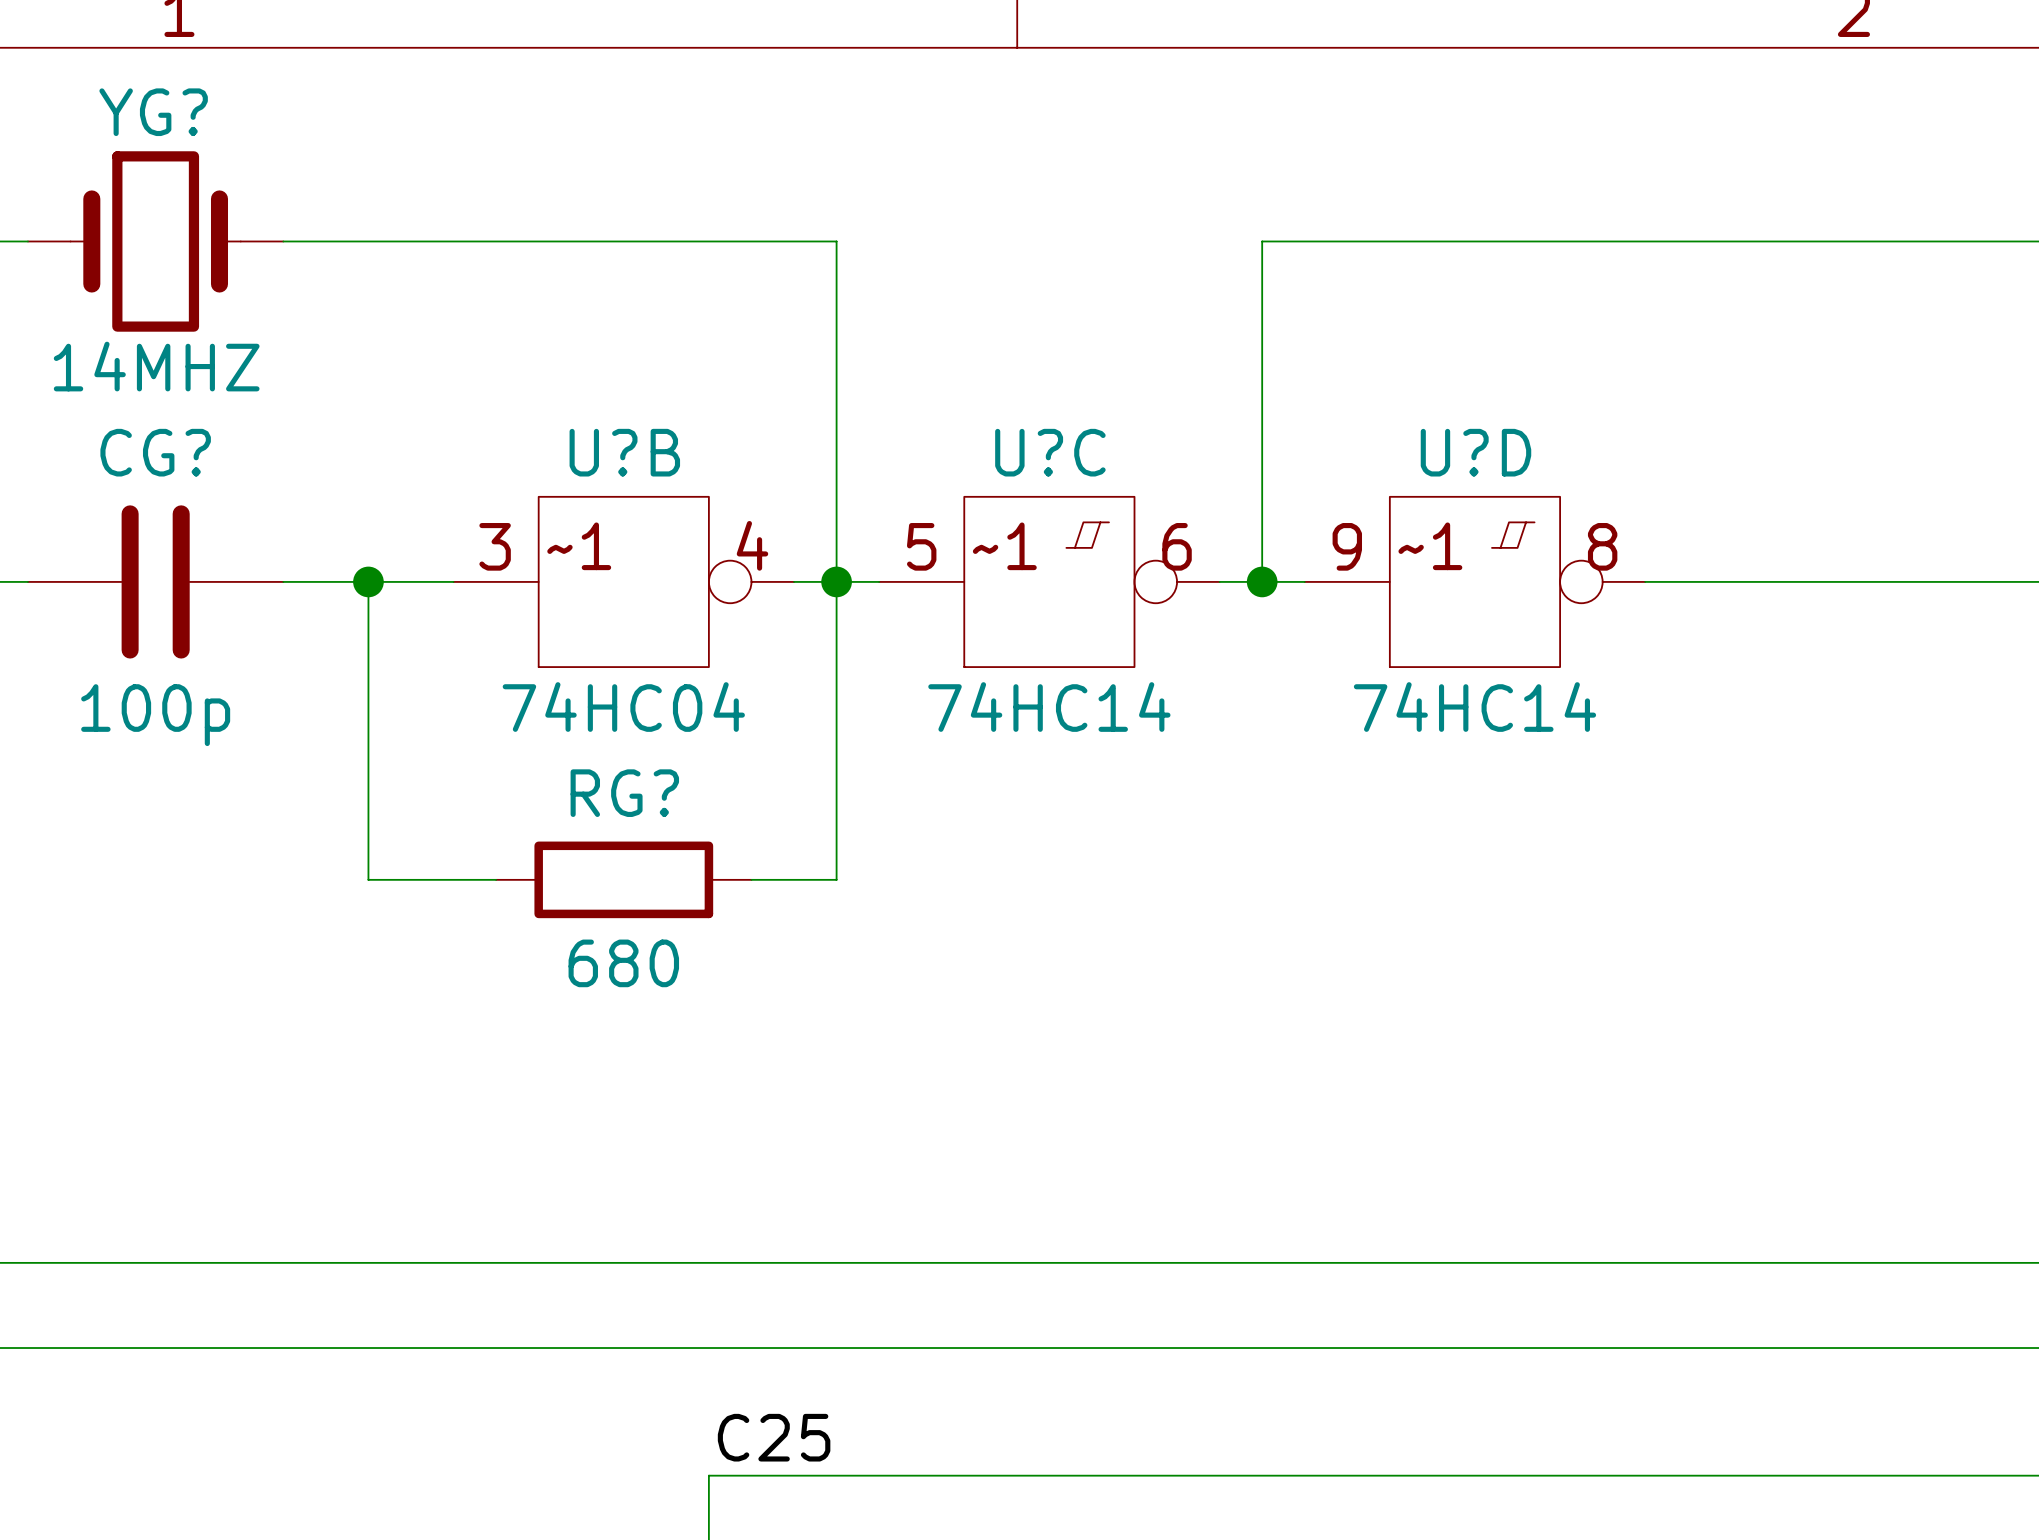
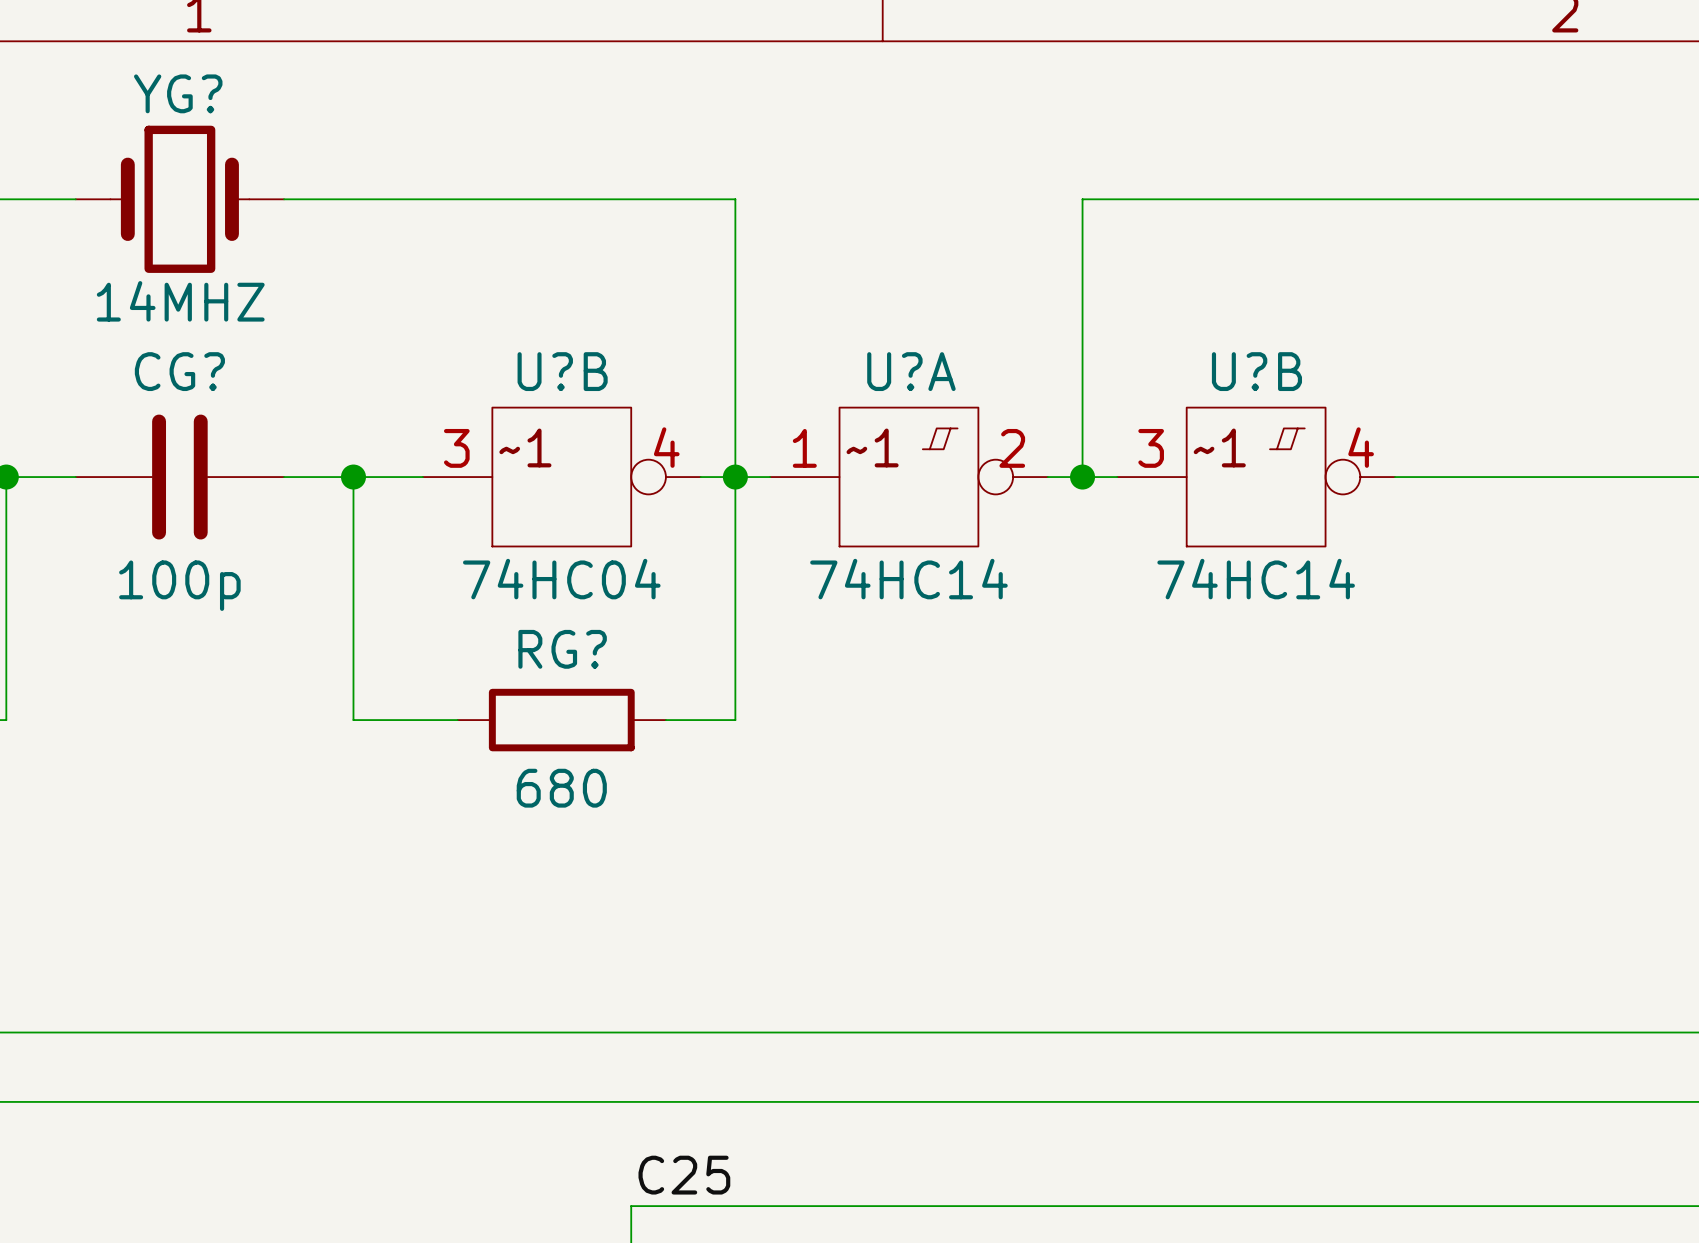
U?C name: U?C (1050, 452) -> U?A (911, 371)
U?D name: U?D (1475, 452) -> U?B (1256, 371)
U?C pin number: 5 (921, 546) -> 1 (804, 448)
U?C pin number: 6 (1177, 546) -> 2 (1012, 448)
U?D pin number: 9 (1347, 546) -> 3 (1151, 448)
U?D pin number: 8 (1602, 546) -> 4 (1361, 447)

